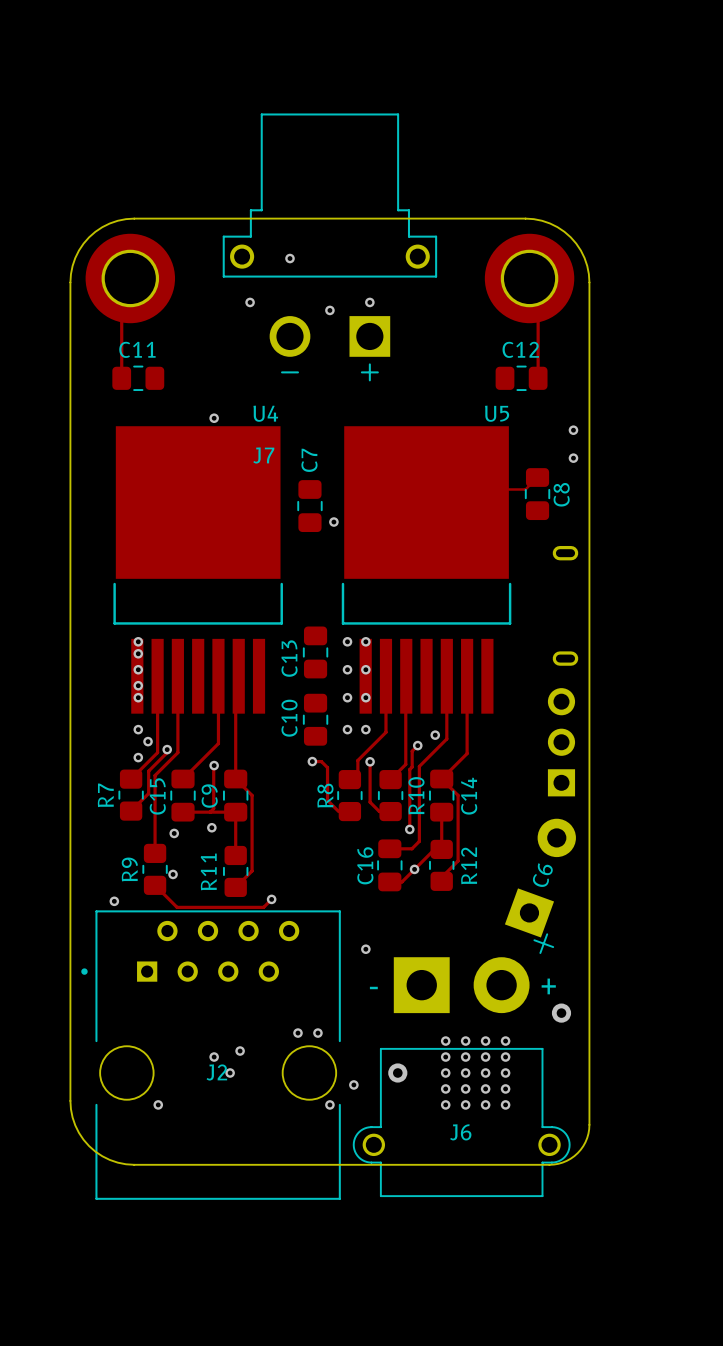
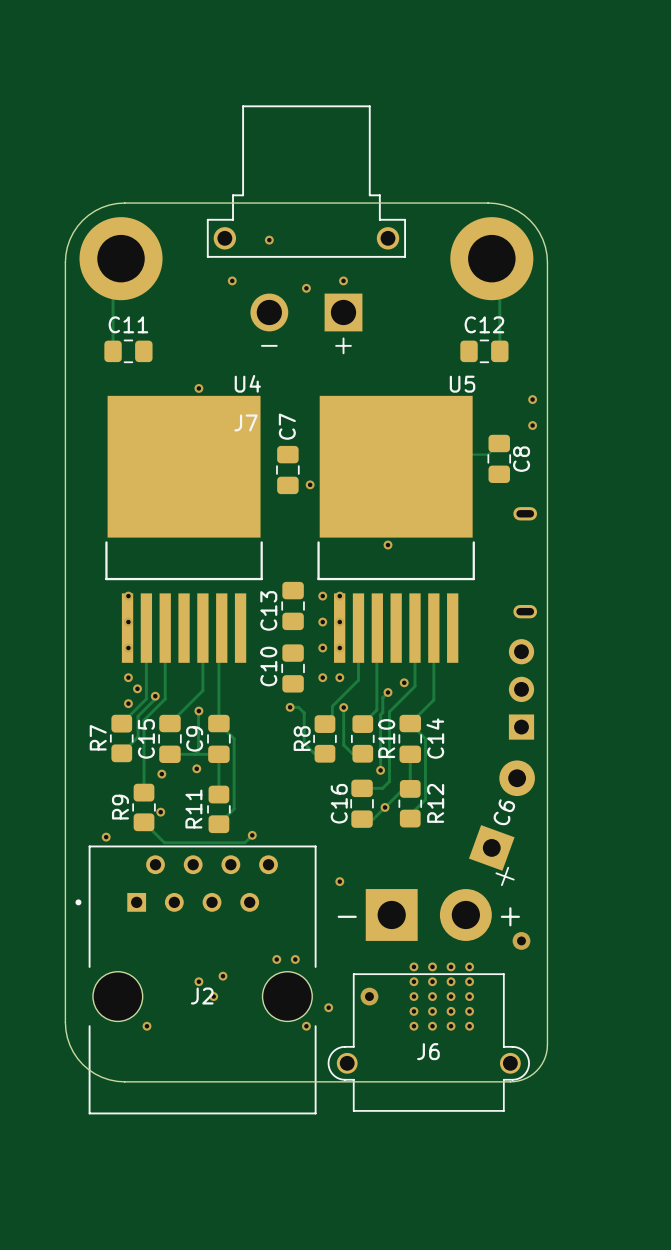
via: none -> (388, 545)
via: (138, 653) -> none
via: (138, 685) -> none

